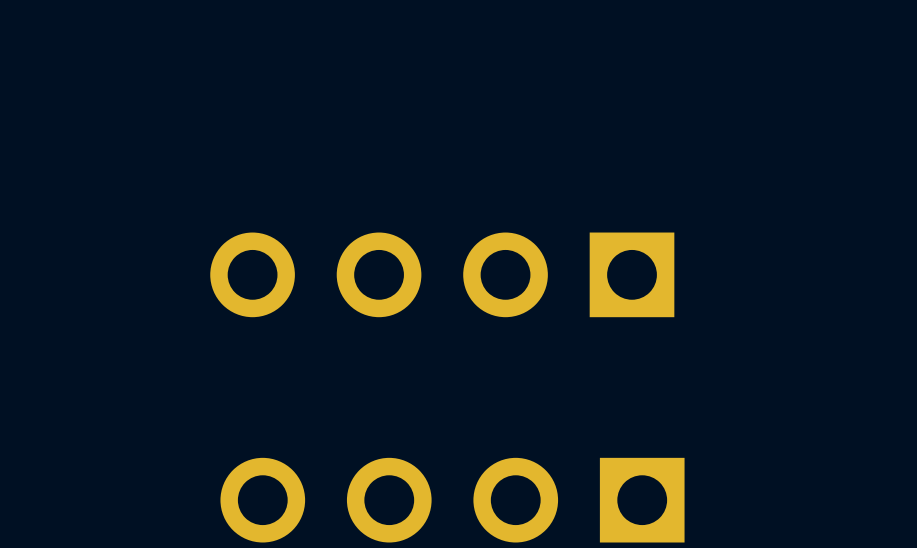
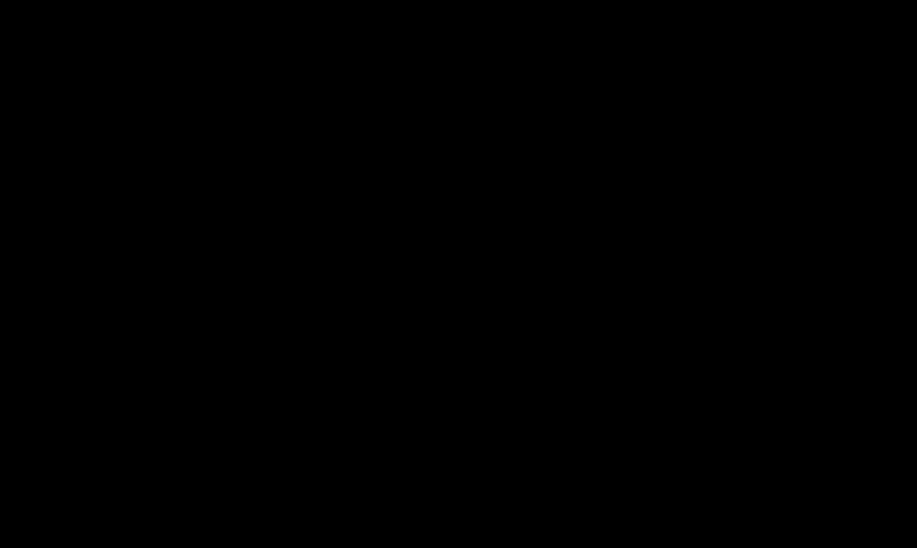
part: (442, 274) -> none
part: (452, 500) -> none

